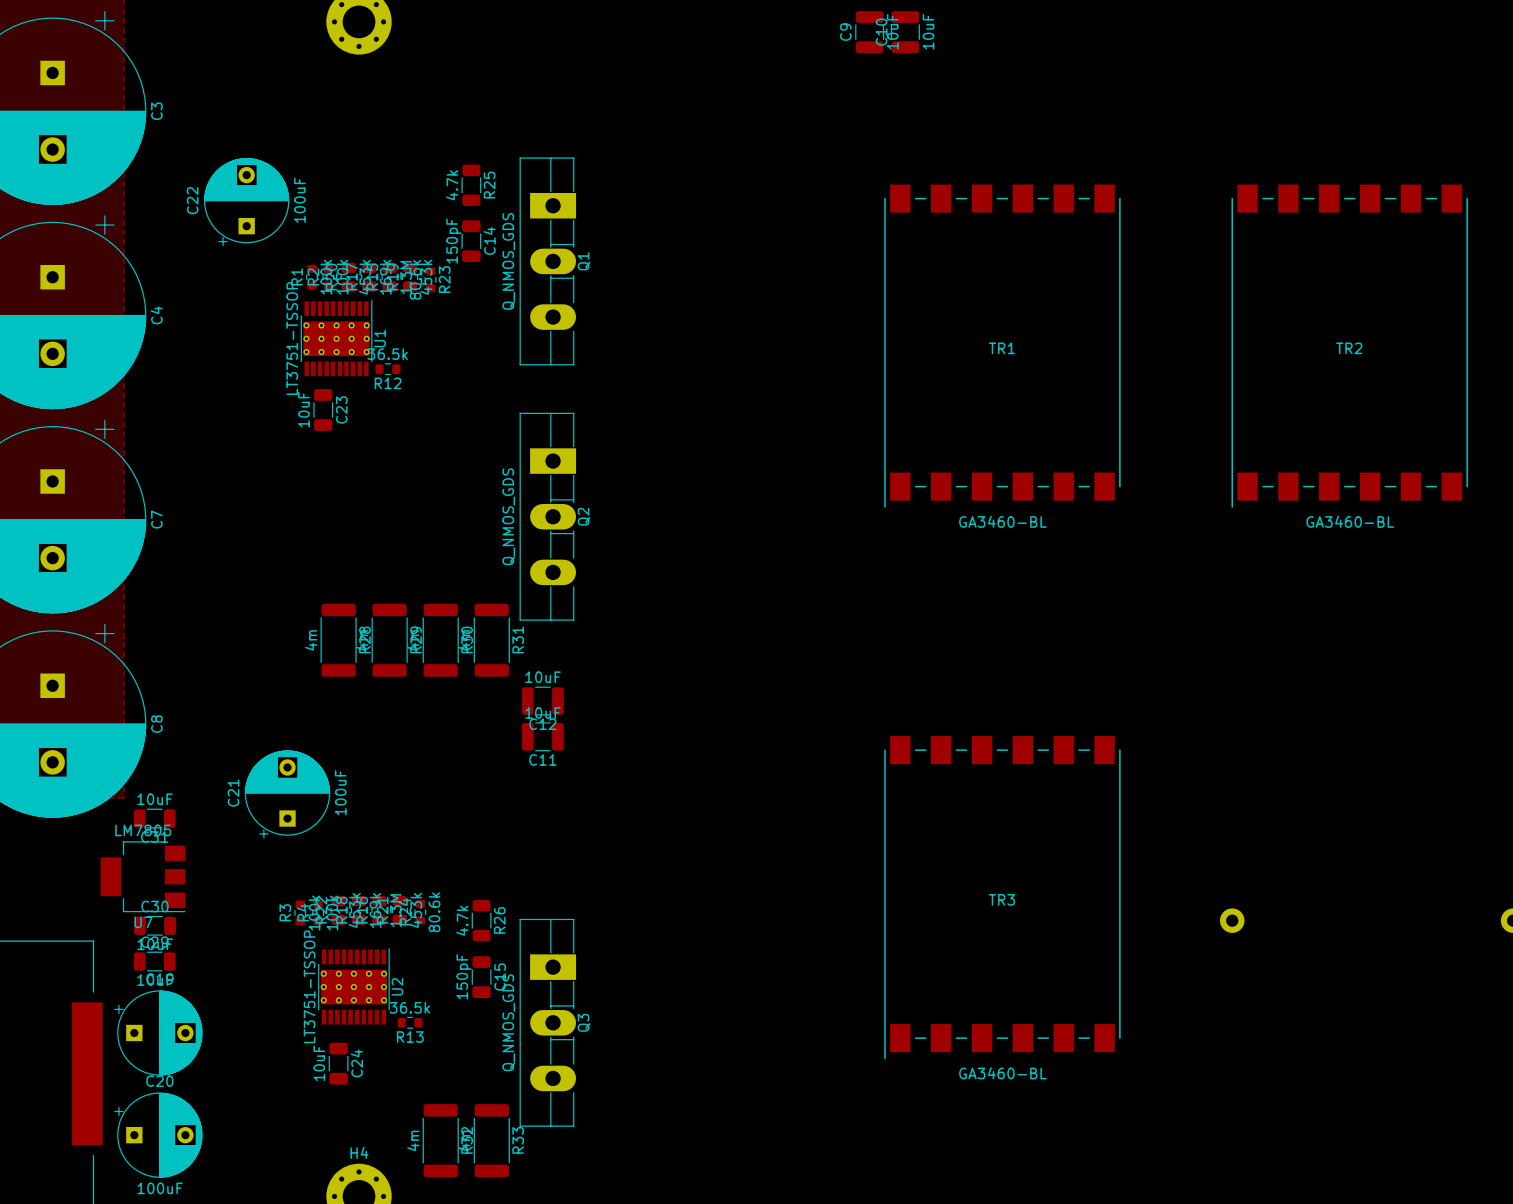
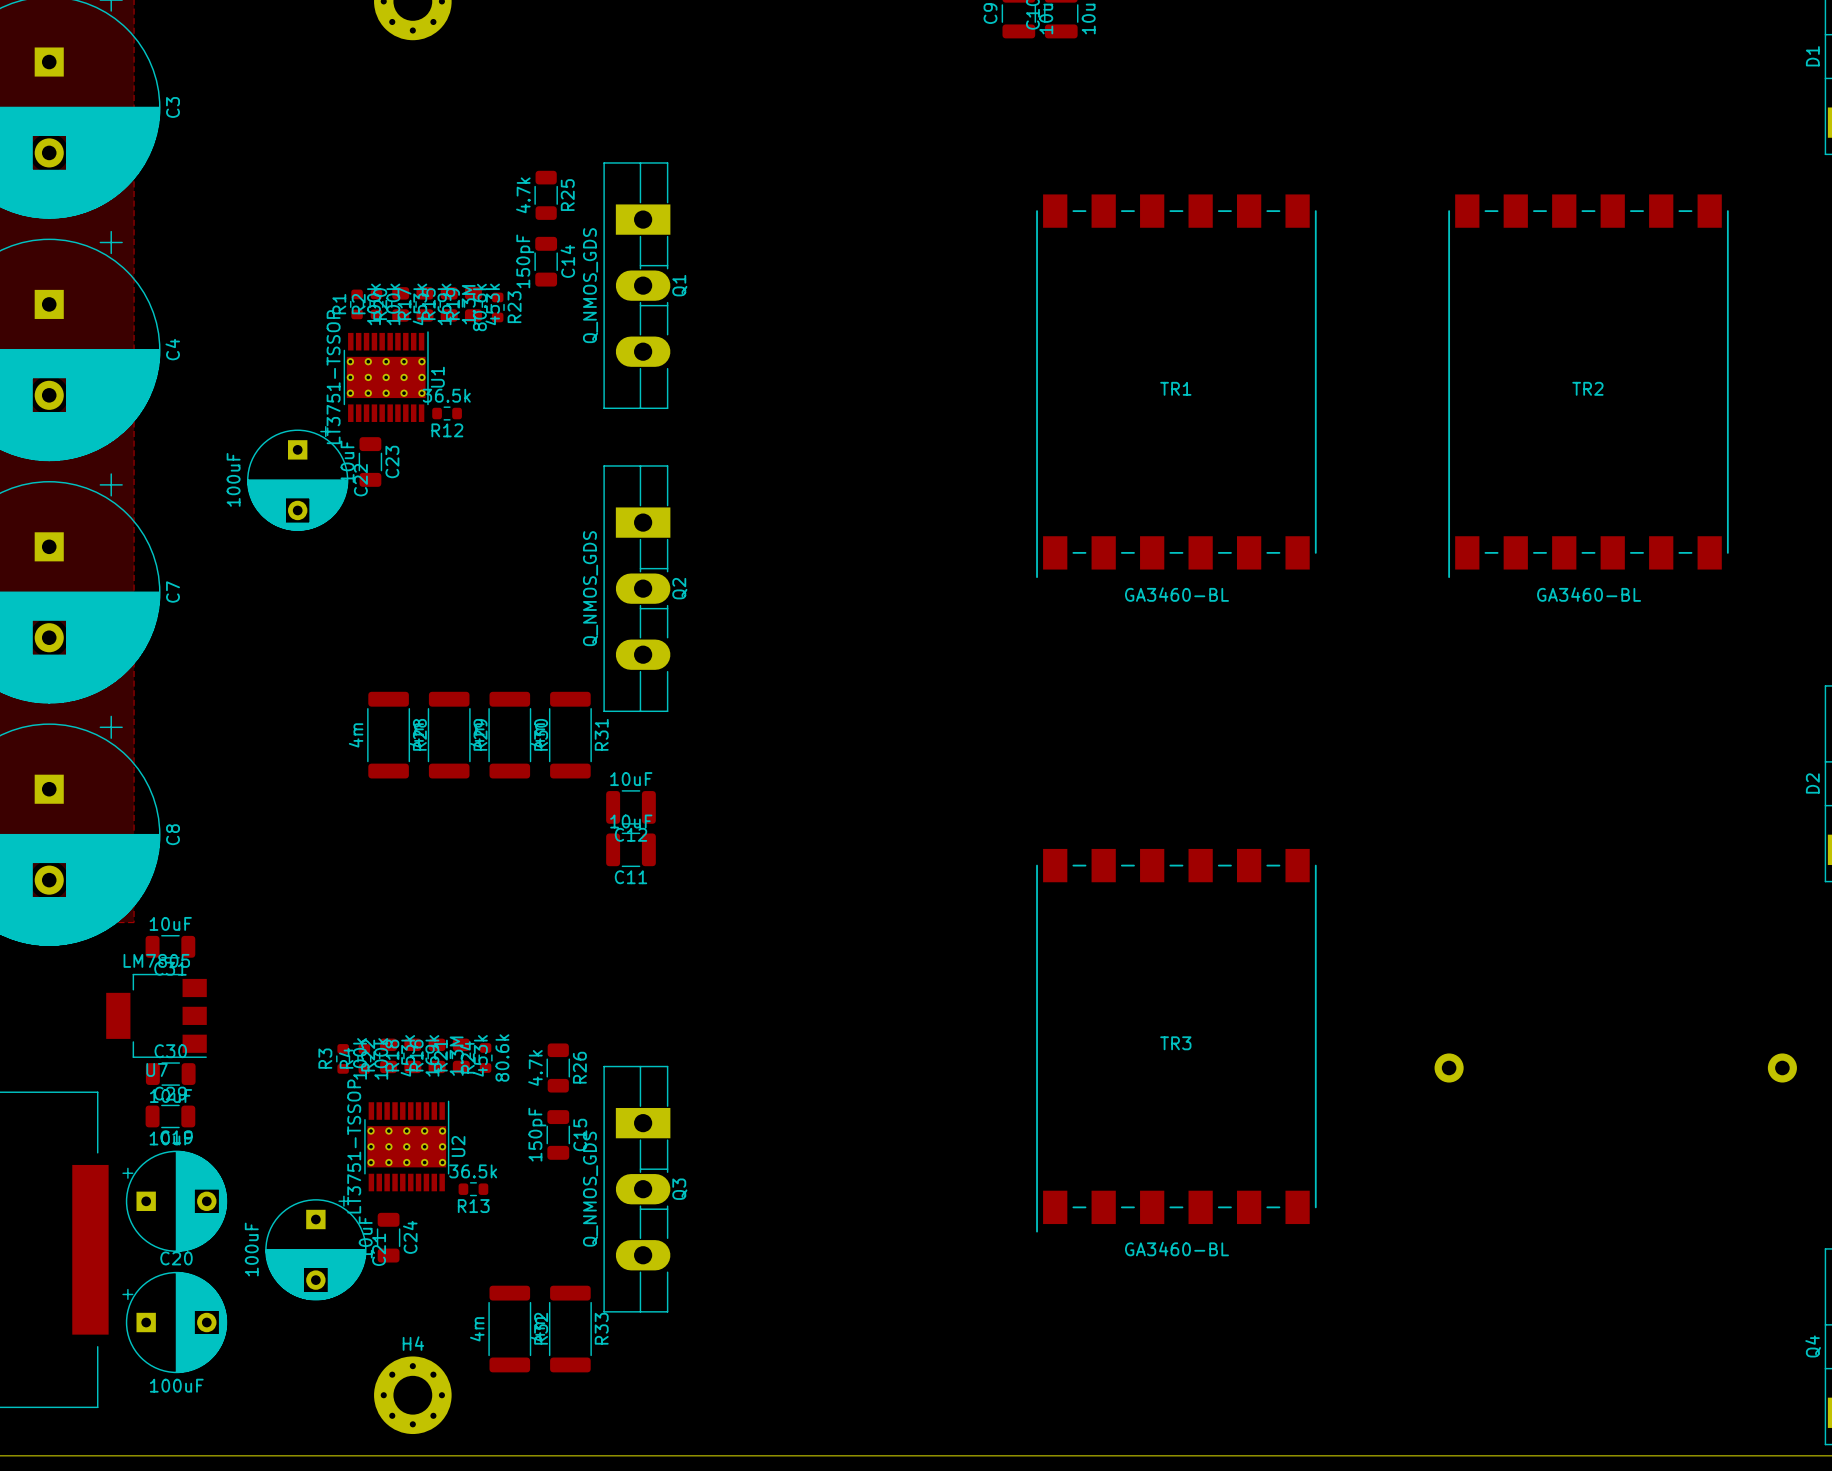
C22 rotation: 0° (246, 202) -> 180° (297, 478)
C22 position: (246, 202) -> (297, 478)
C21 rotation: 0° (287, 794) -> 180° (315, 1248)
C21 position: (287, 794) -> (315, 1248)

